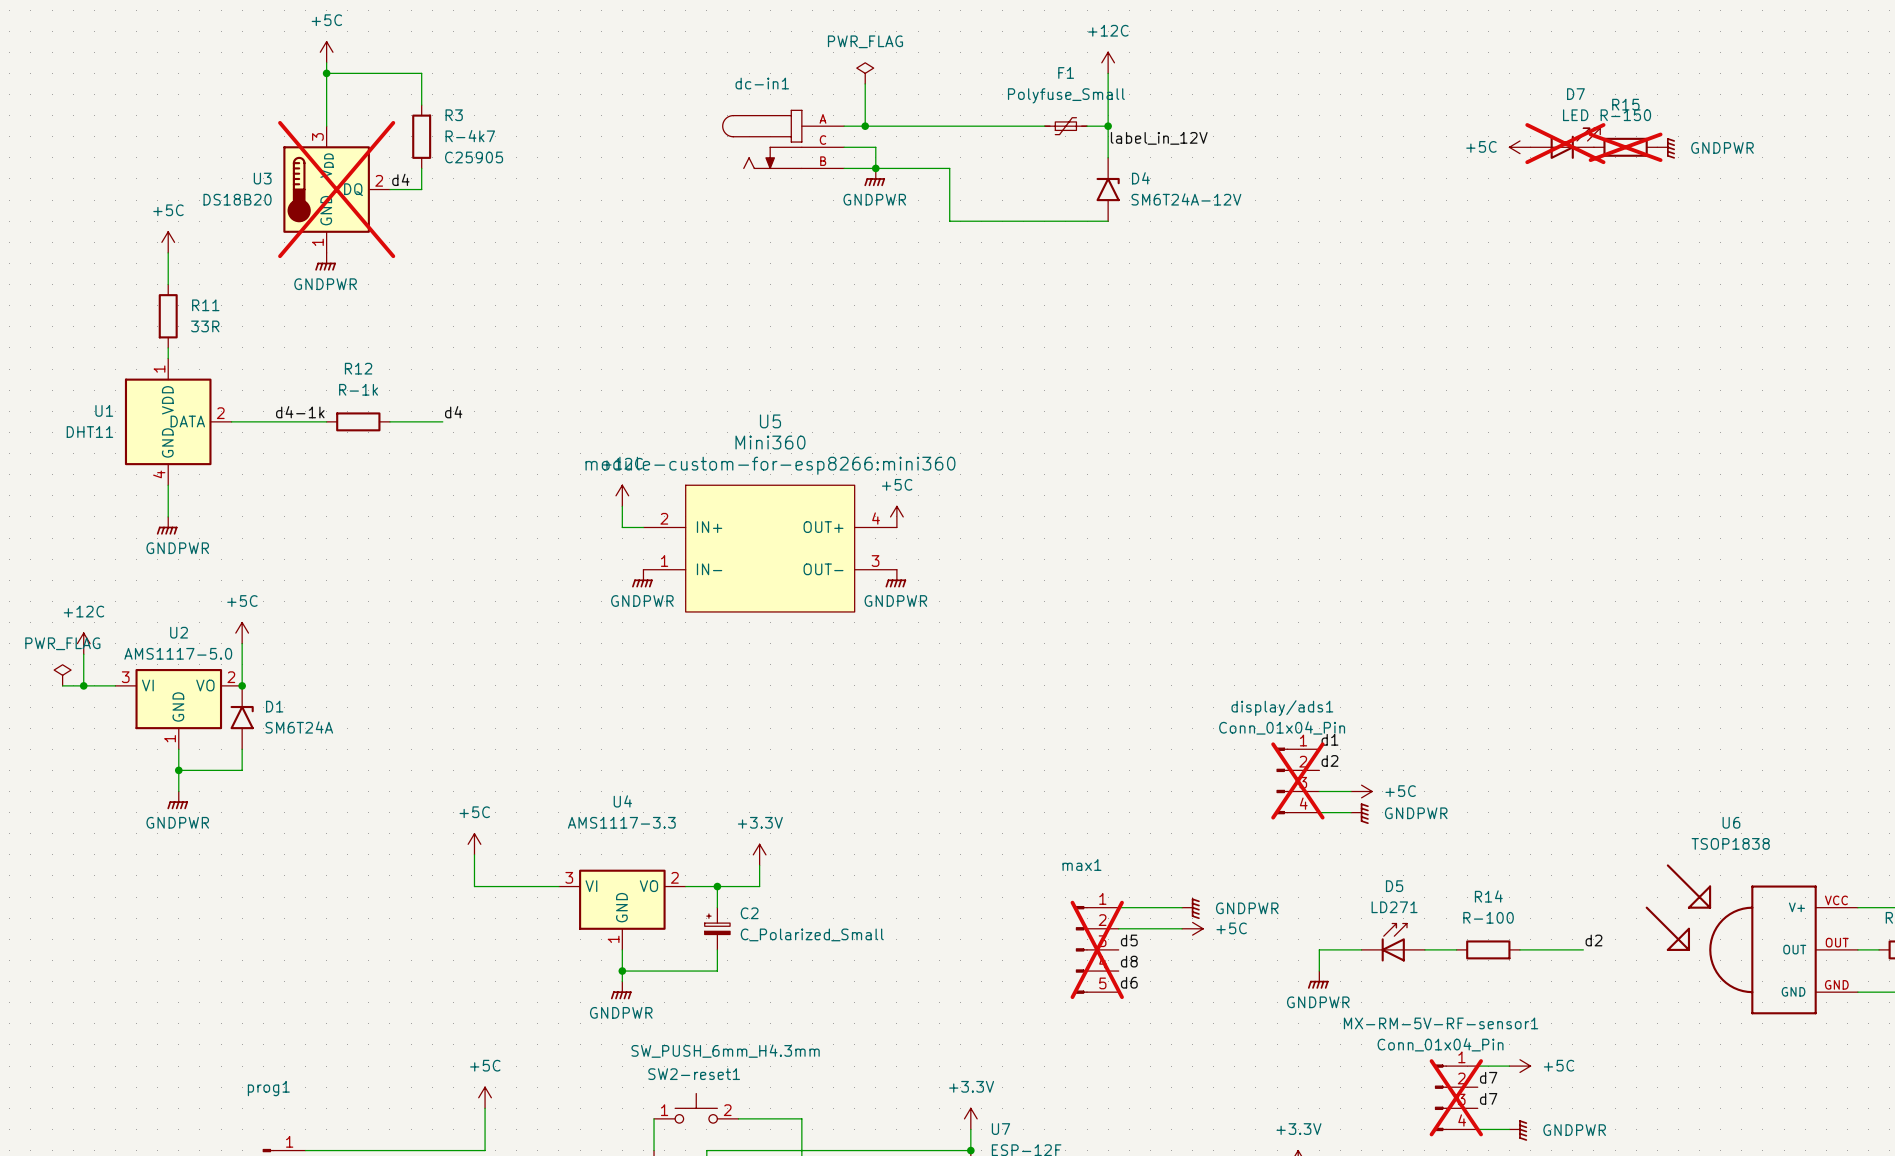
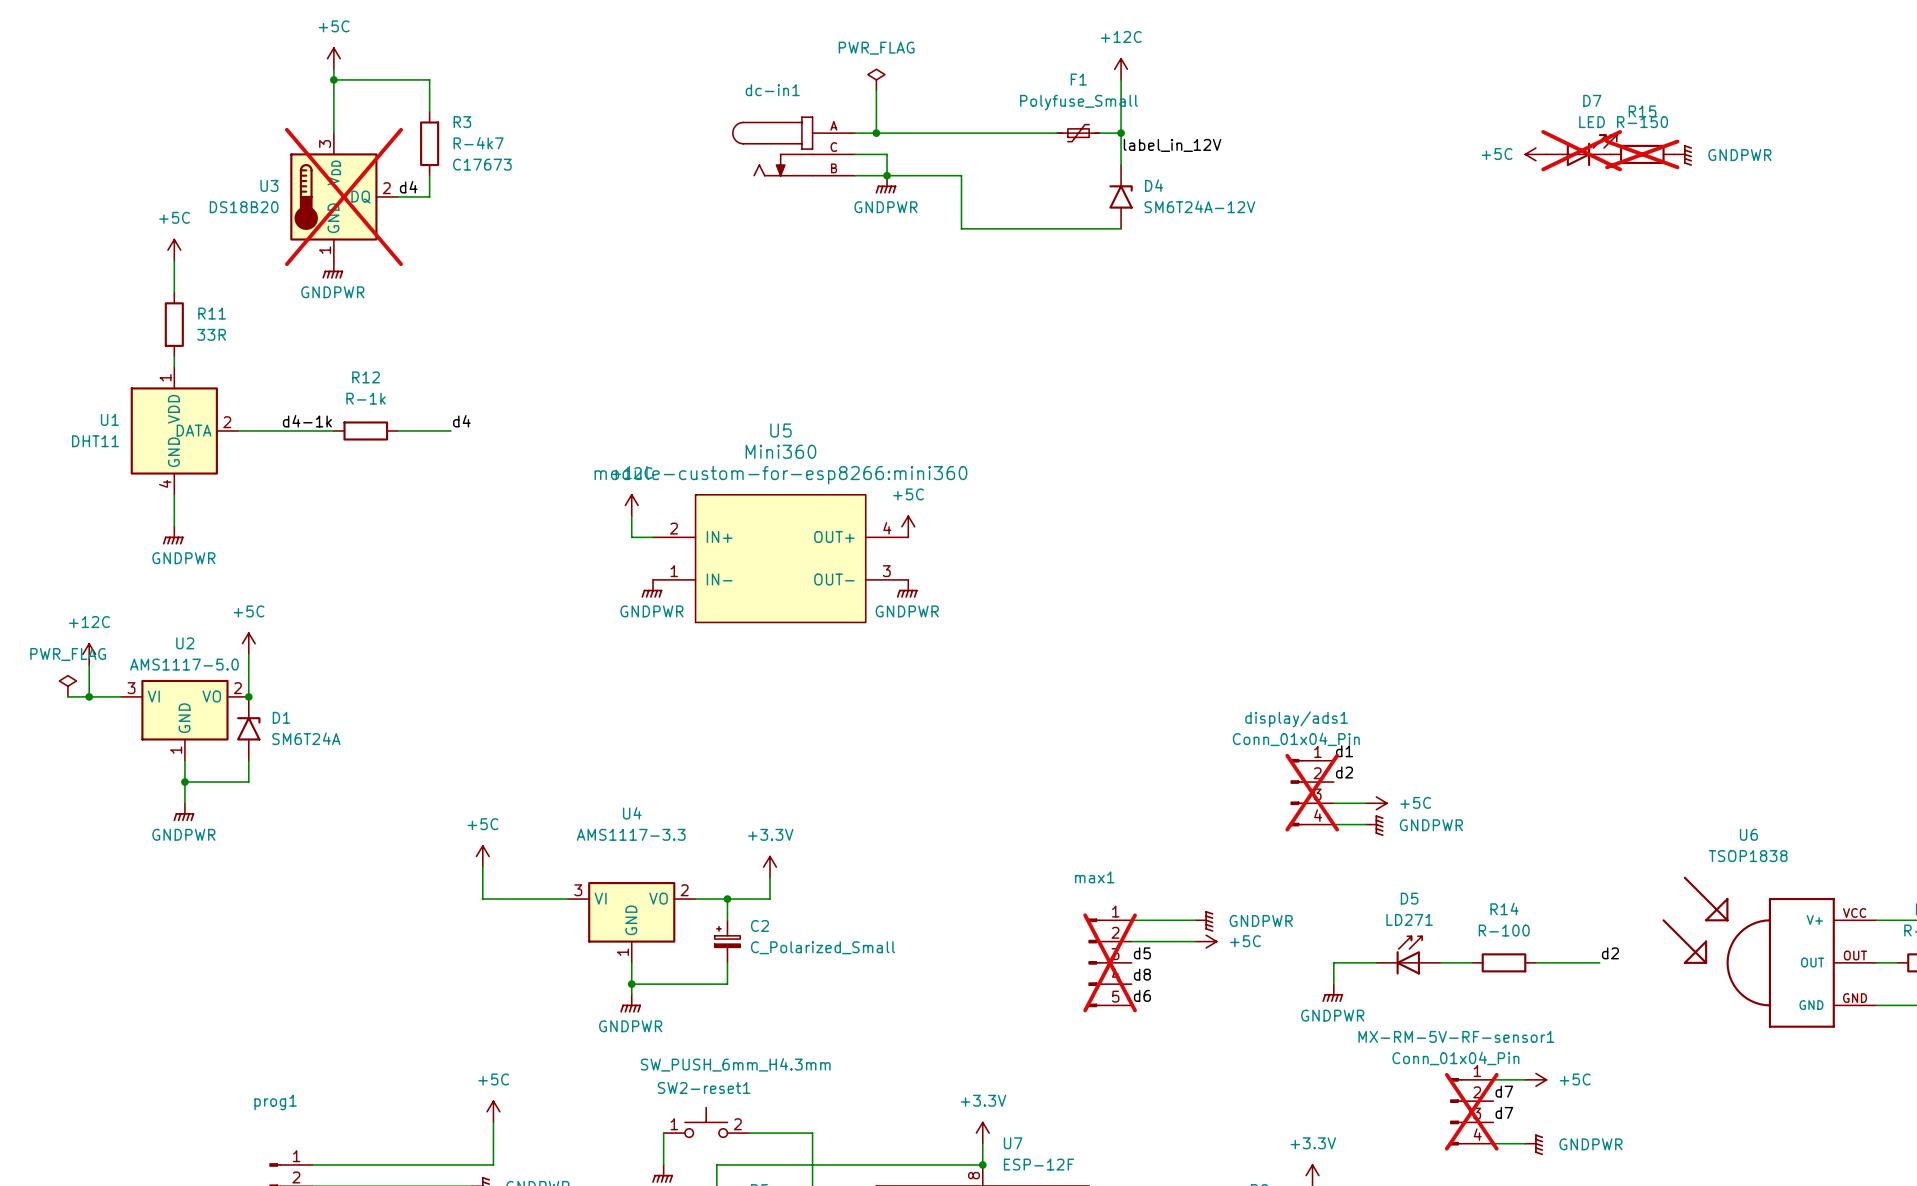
R3 text: C25905 (474, 157) -> C17673 (482, 164)

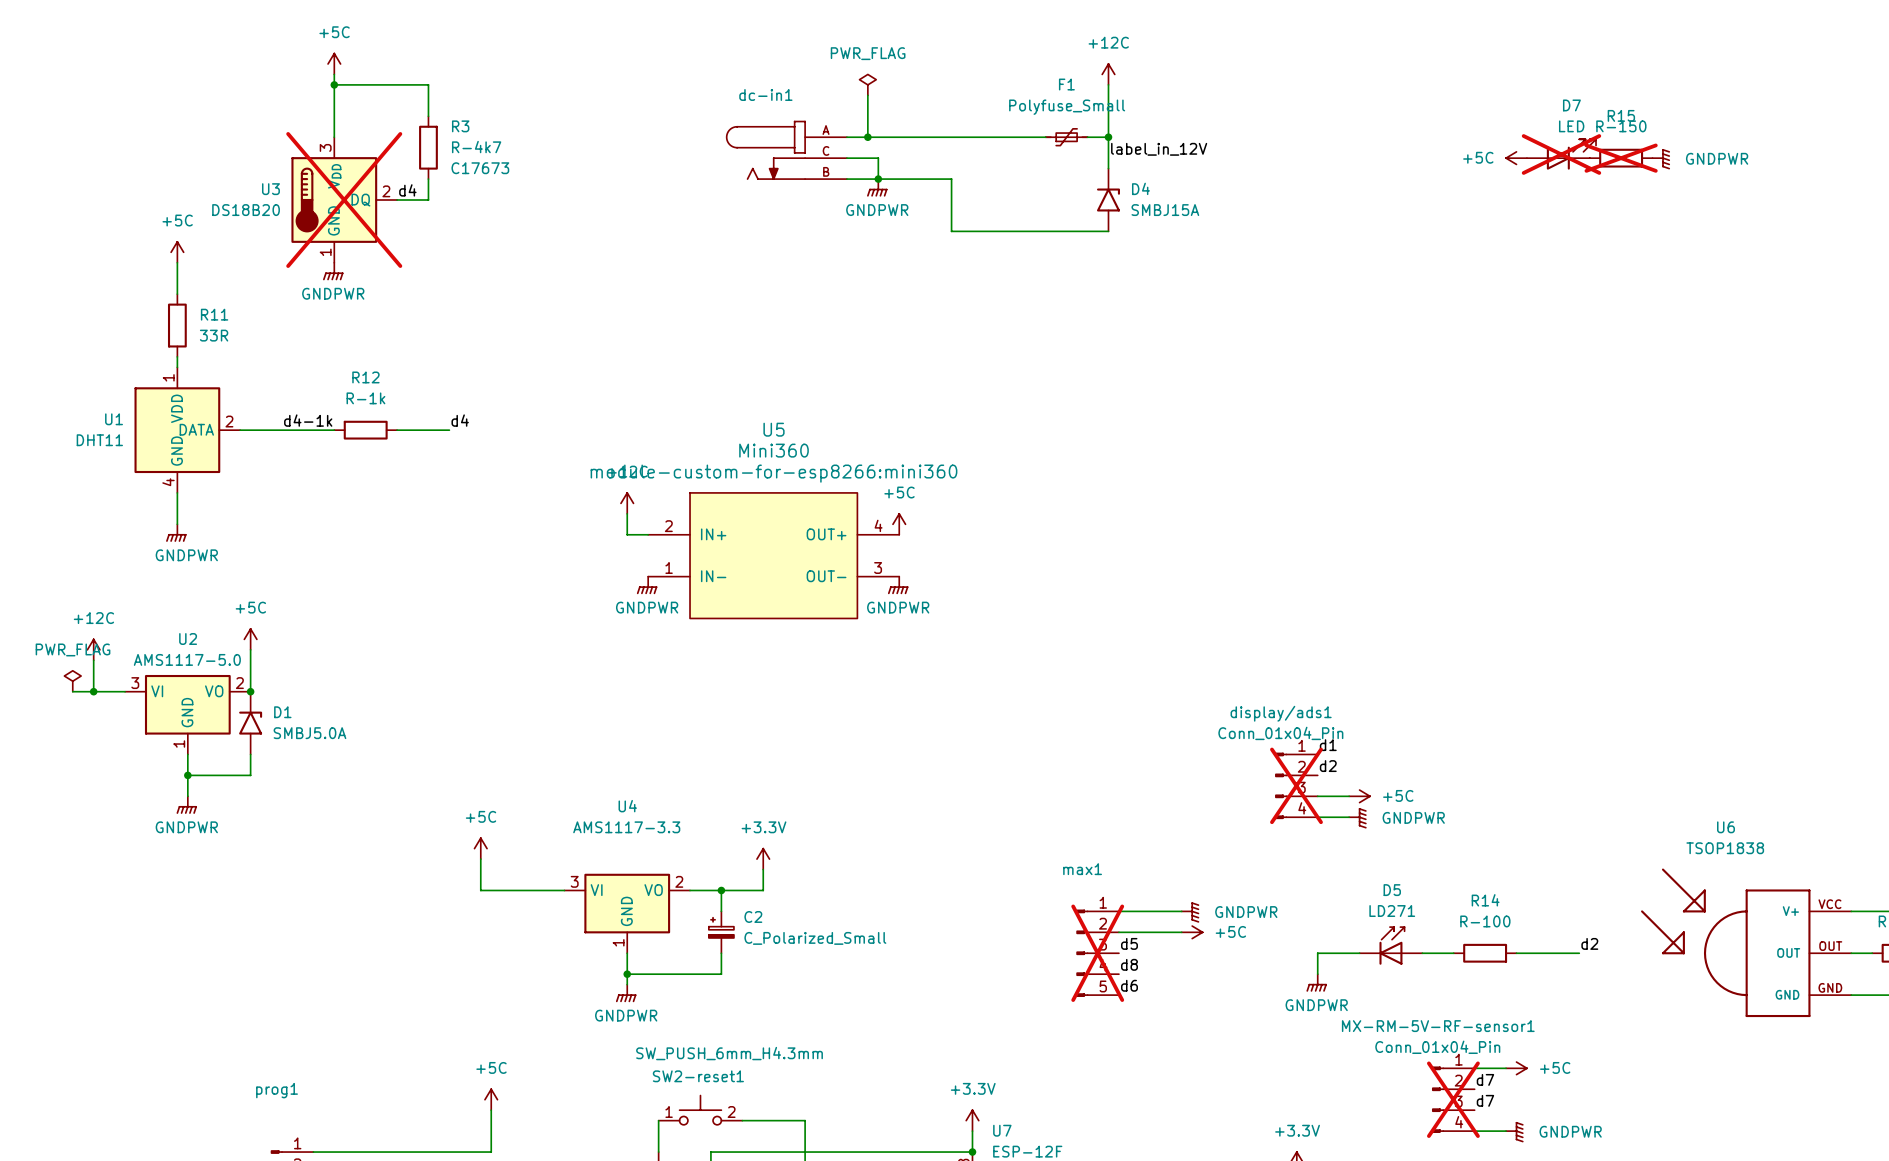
D4 value: SM6T24A-12V (1199, 206) -> SMBJ15A (1165, 210)
D1 value: SM6T24A (306, 738) -> SMBJ5.0A (309, 733)

